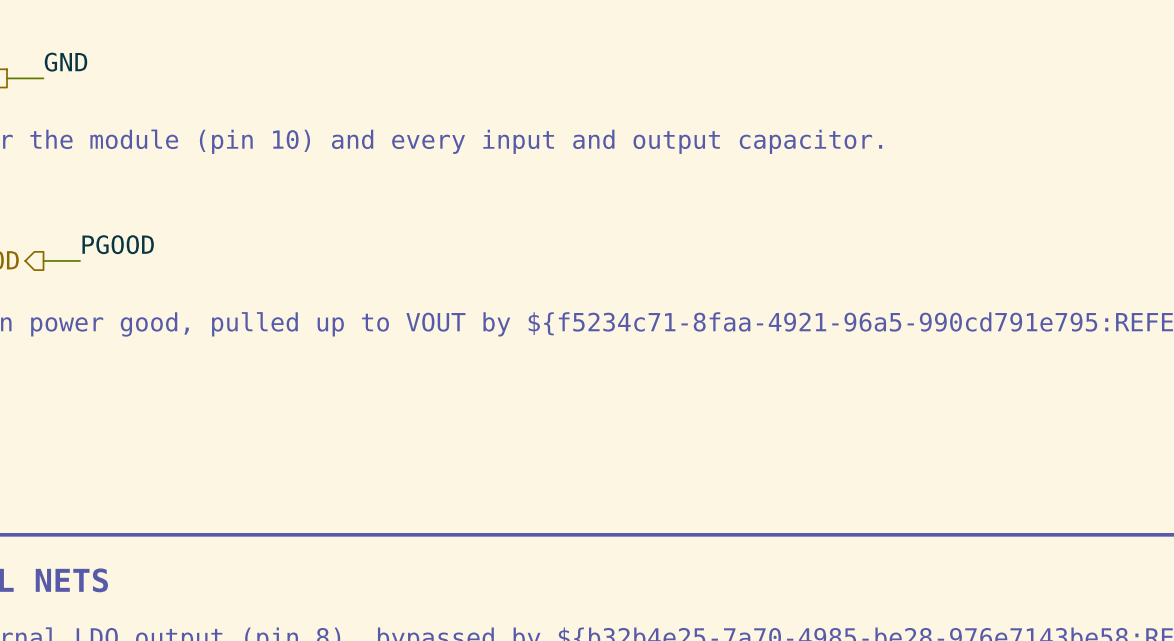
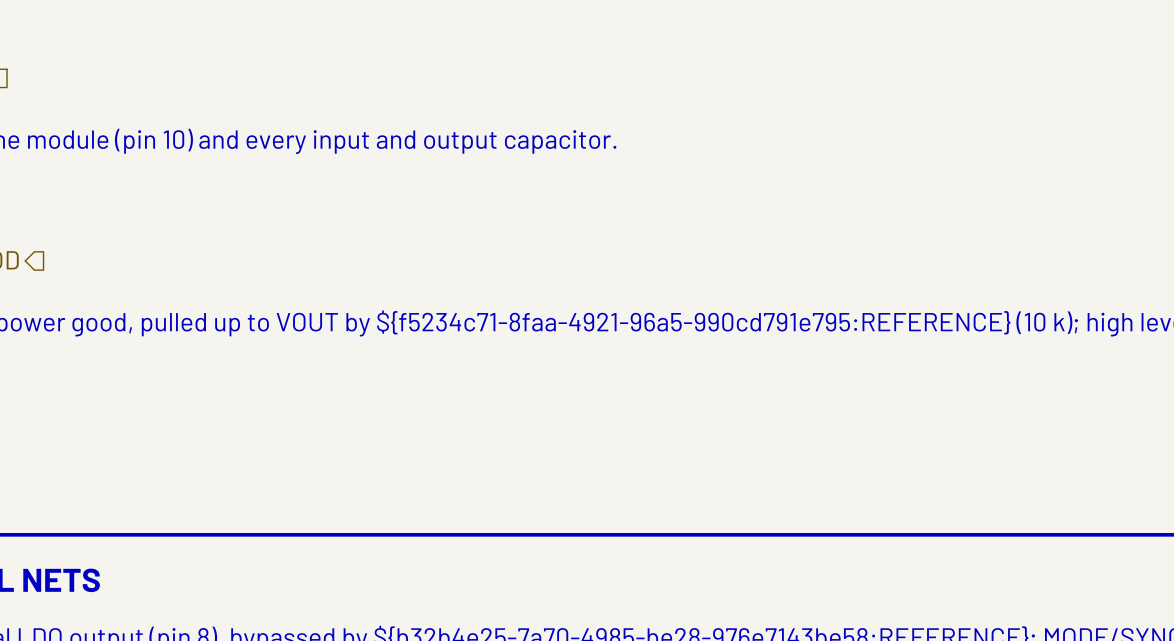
label: GND (65, 62) -> none
wire: (7, 78) (43, 78) -> none
label: PGOOD (118, 244) -> none
wire: (43, 260) (80, 260) -> none

